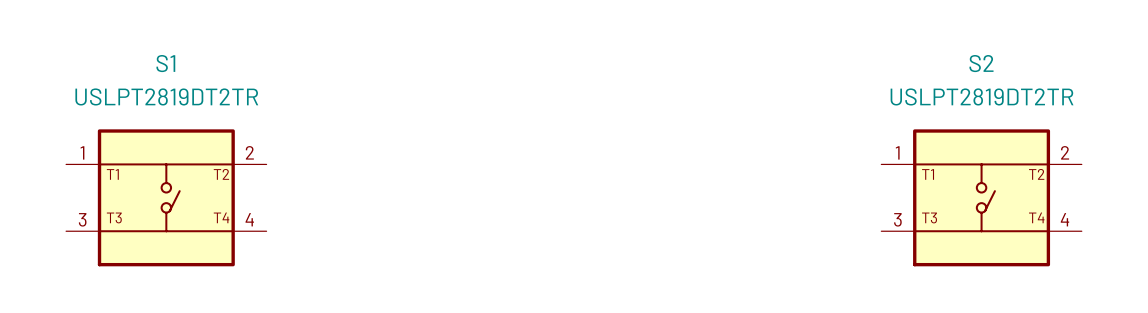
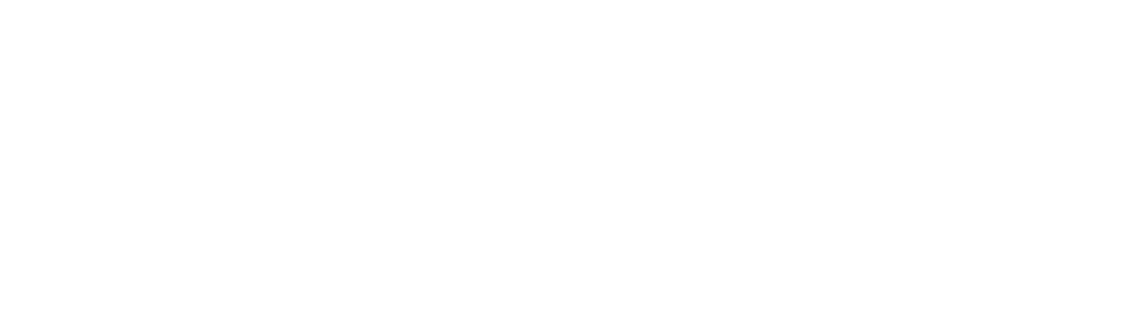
S1: USLPT2819DT2TR (166, 197) -> none
S2: USLPT2819DT2TR (981, 197) -> none

